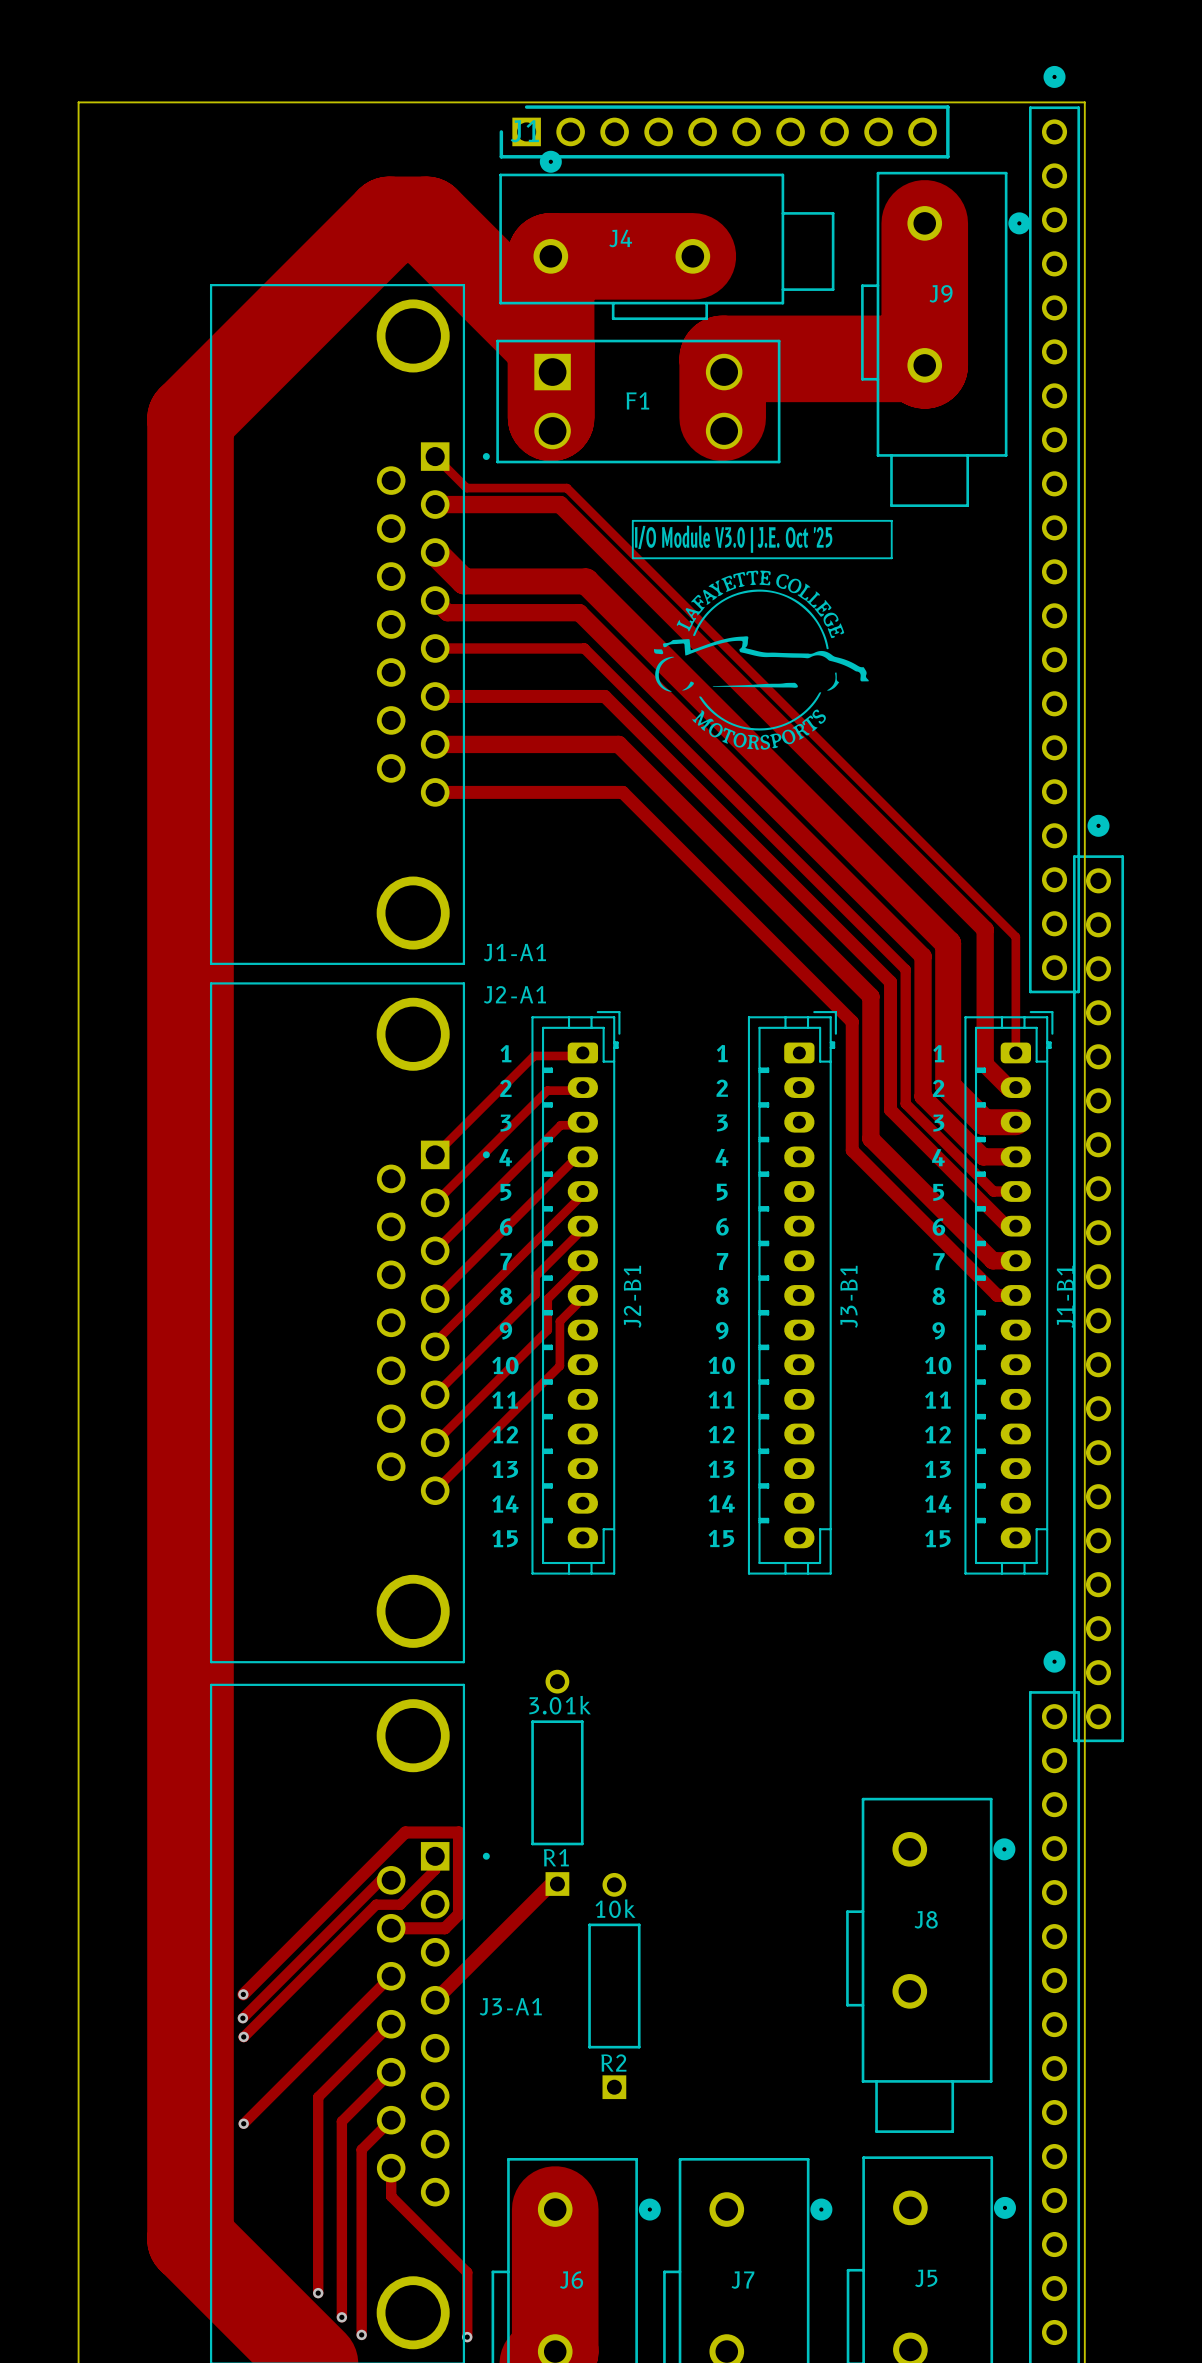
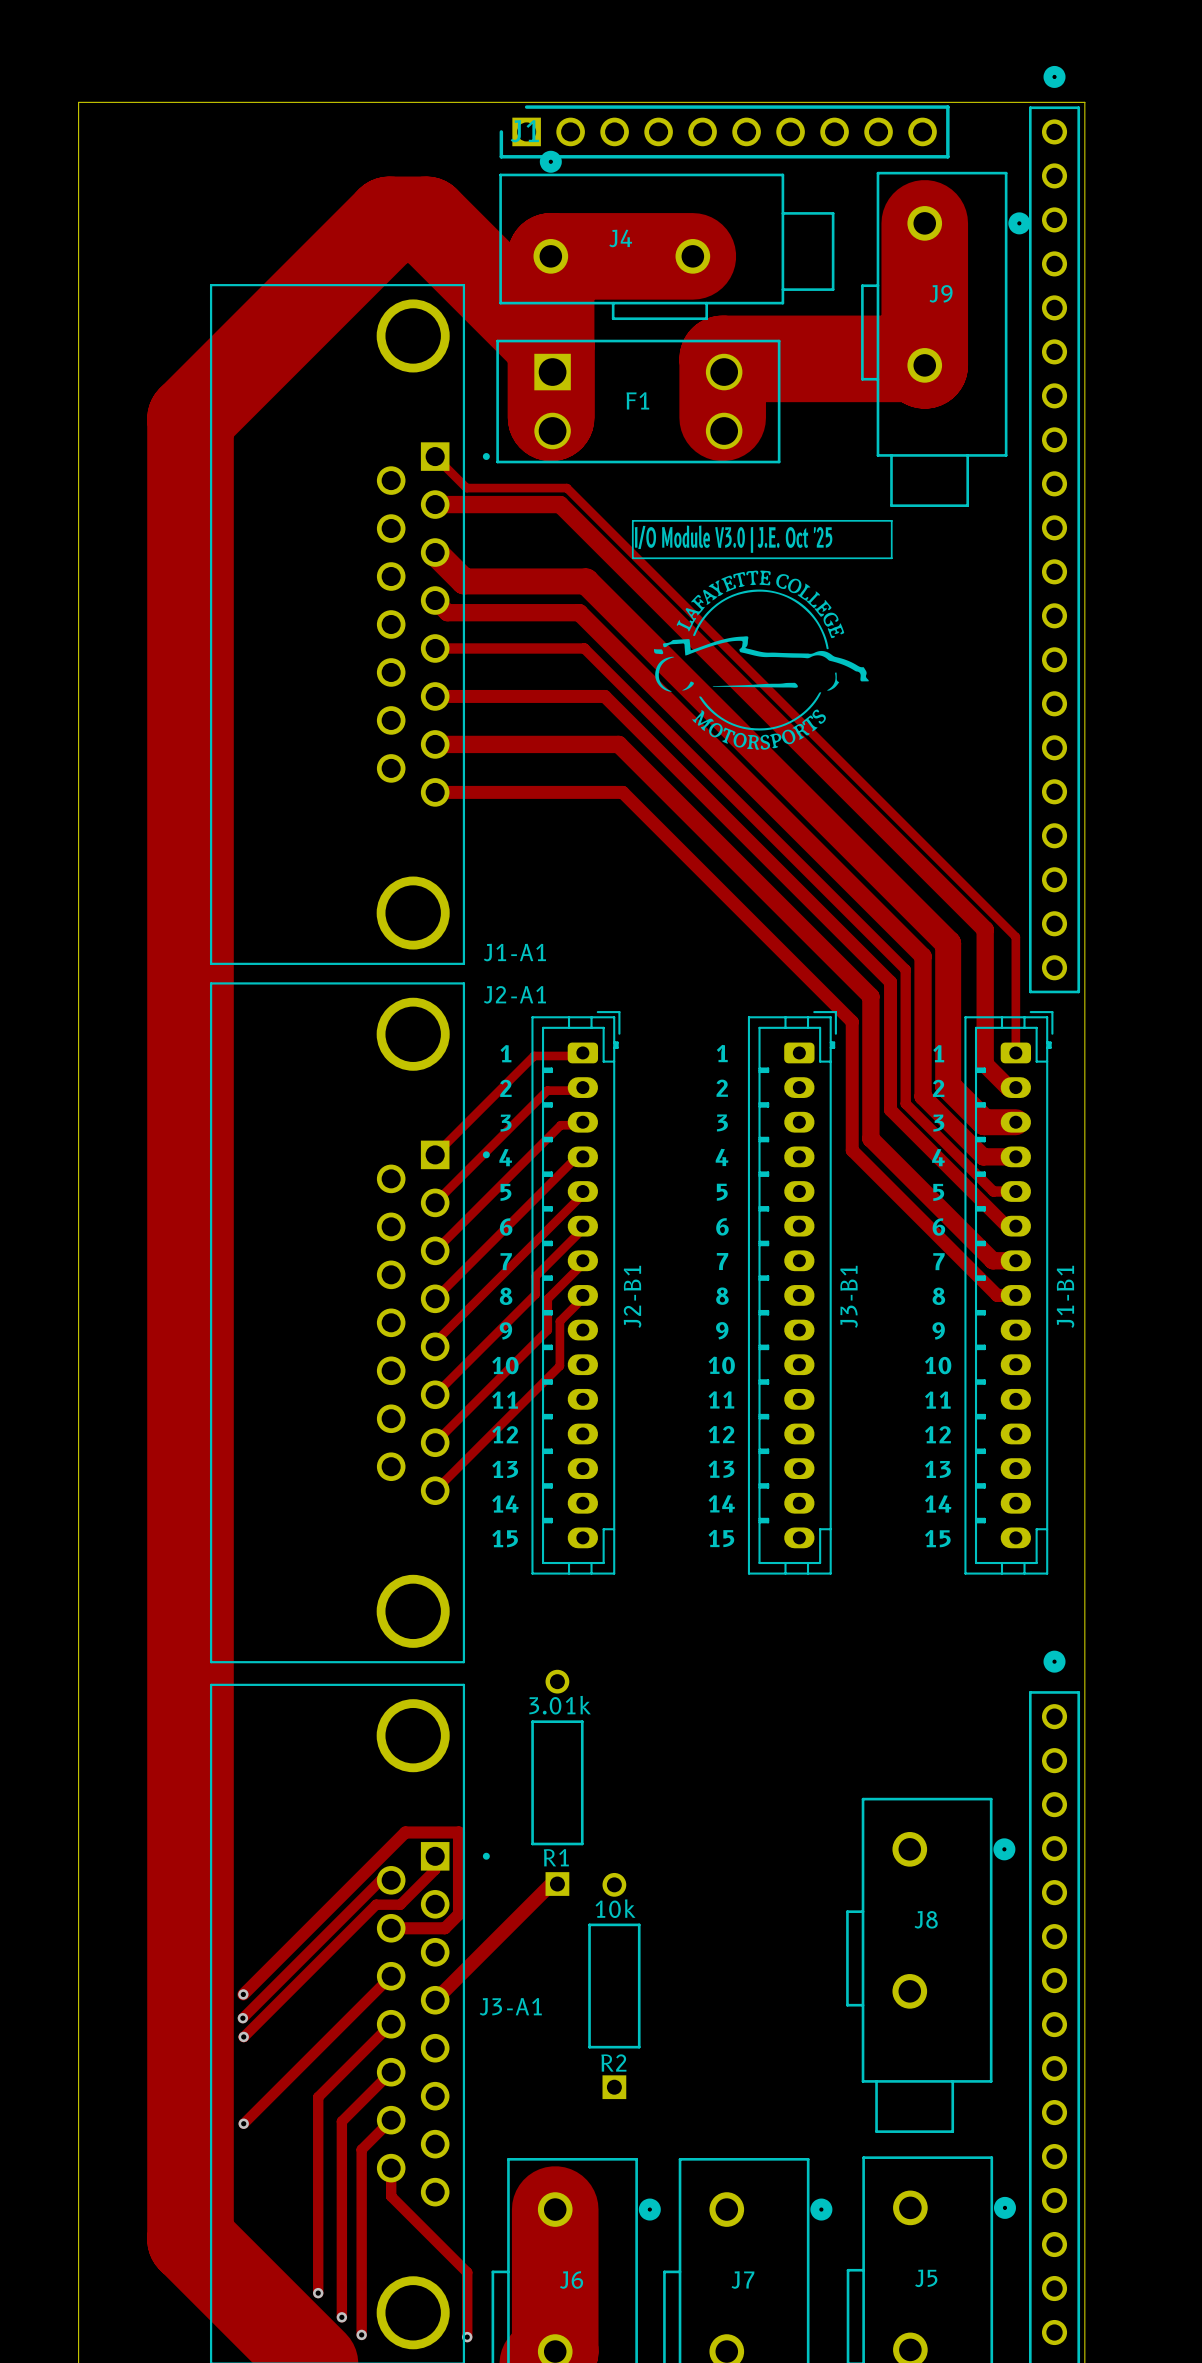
part: (1098, 1278) -> none

